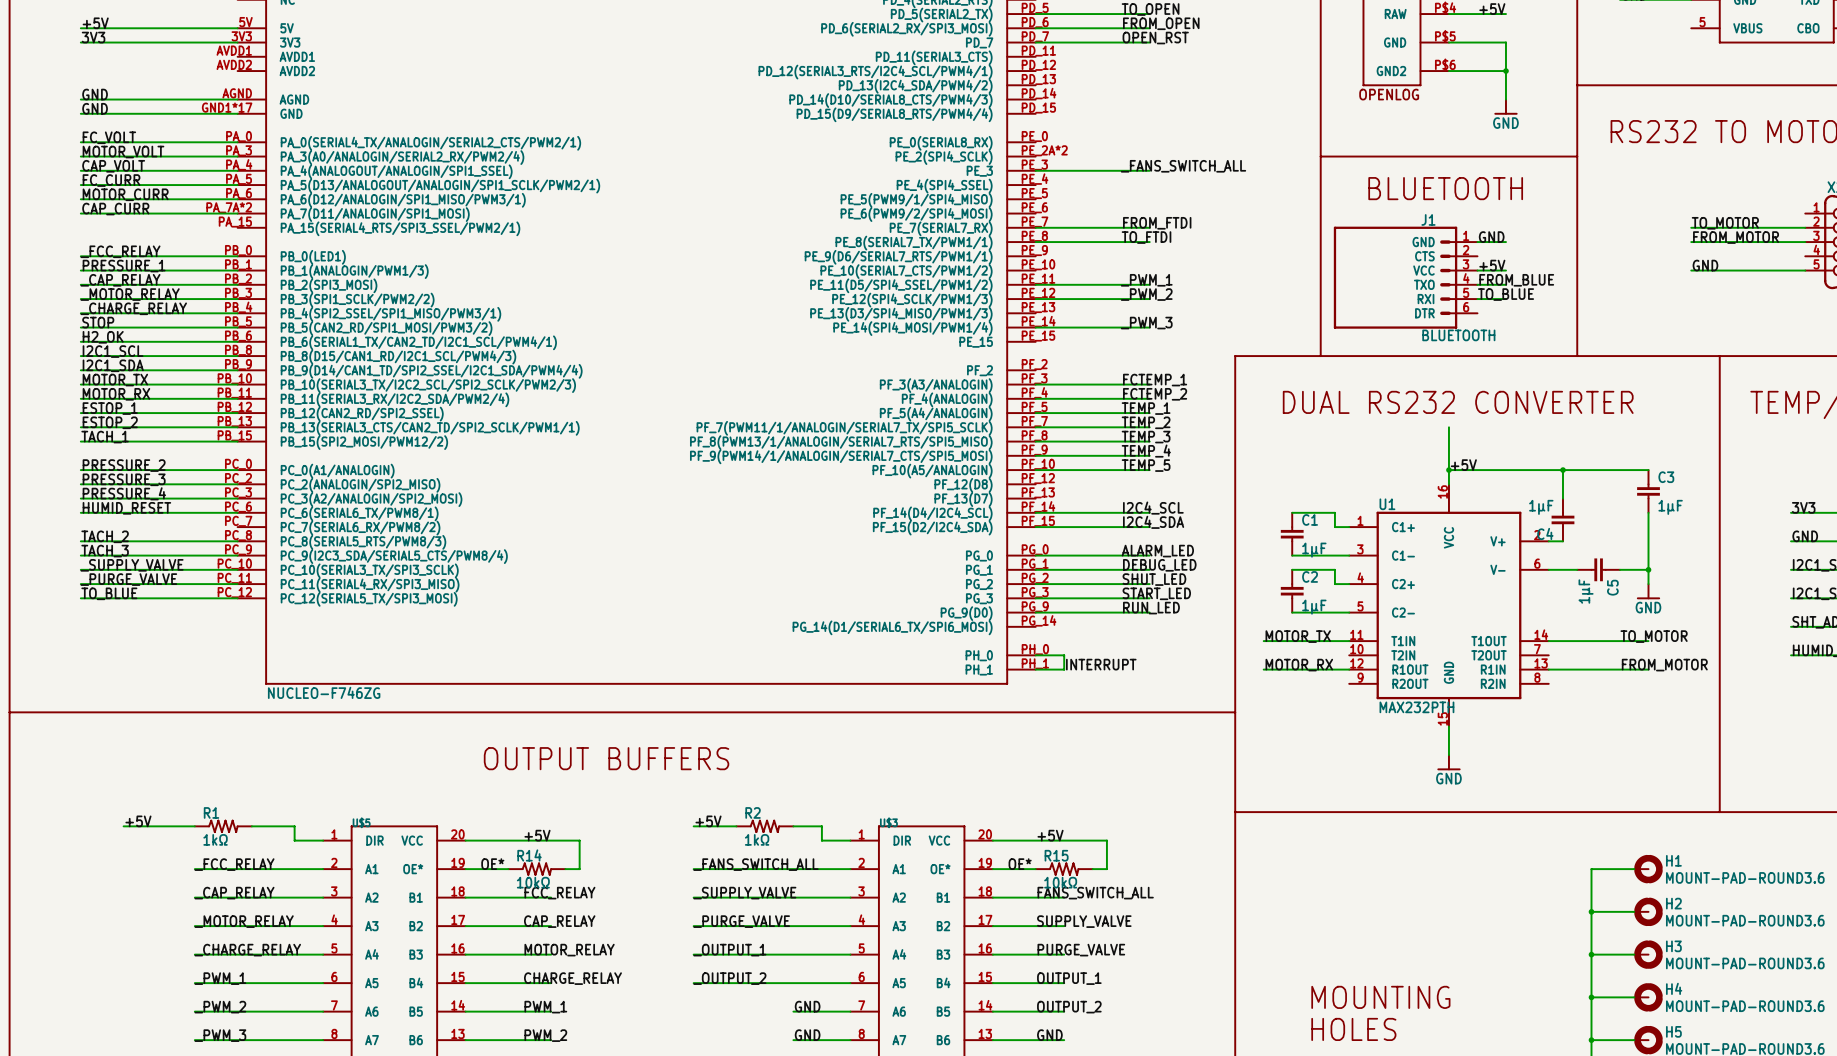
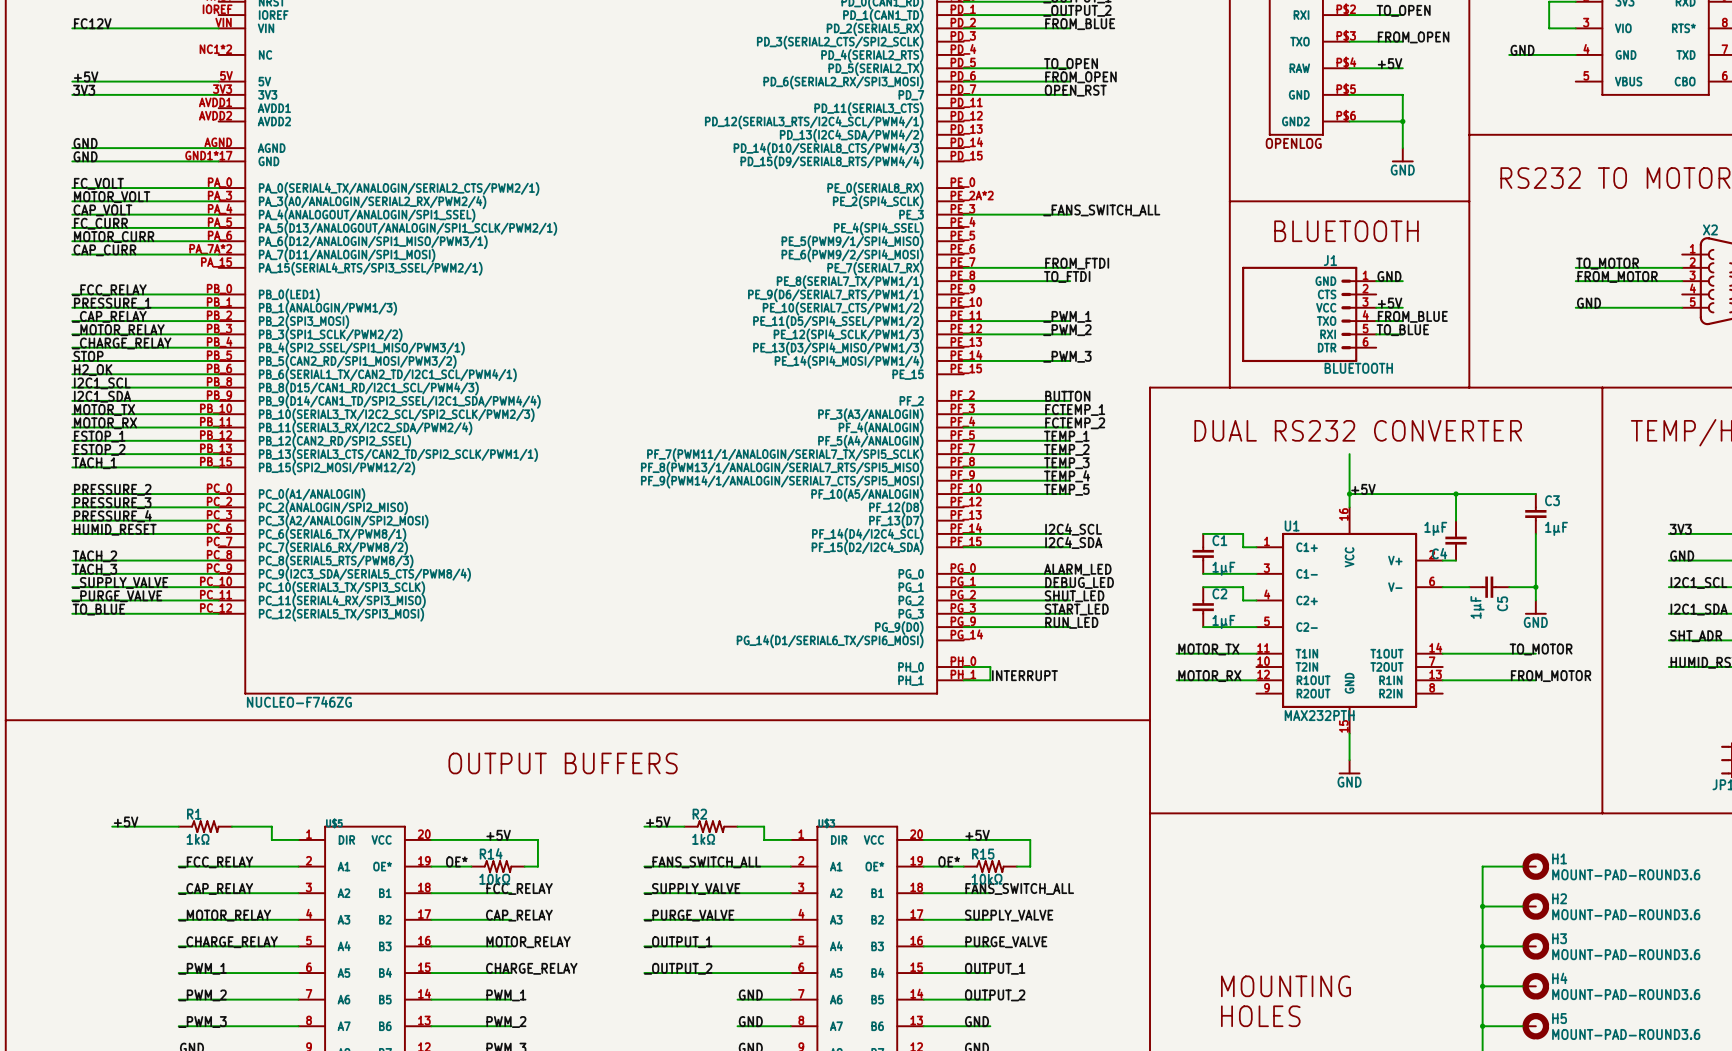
label: none -> BUTTON (1067, 396)
wire: none -> (963, 400) (1070, 400)

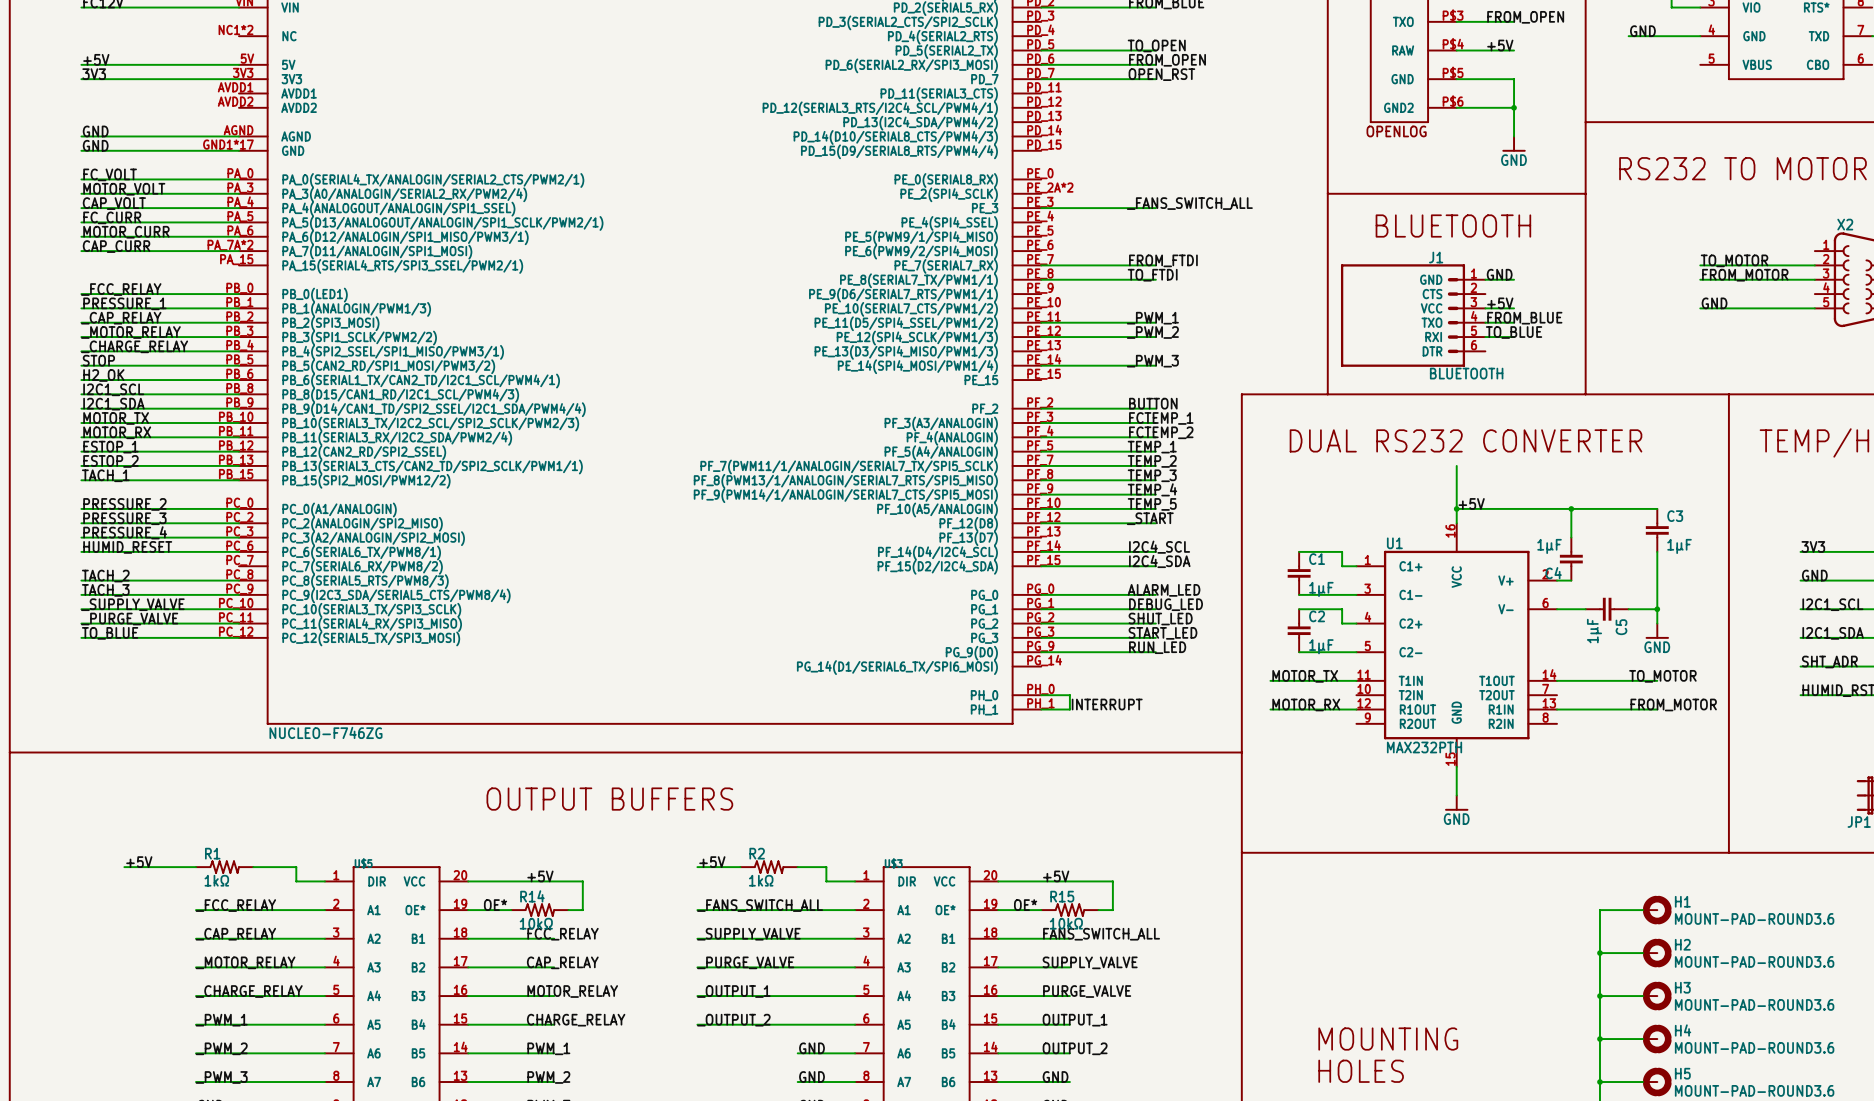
label: none -> _START (1150, 518)
wire: none -> (1041, 523) (1155, 523)

